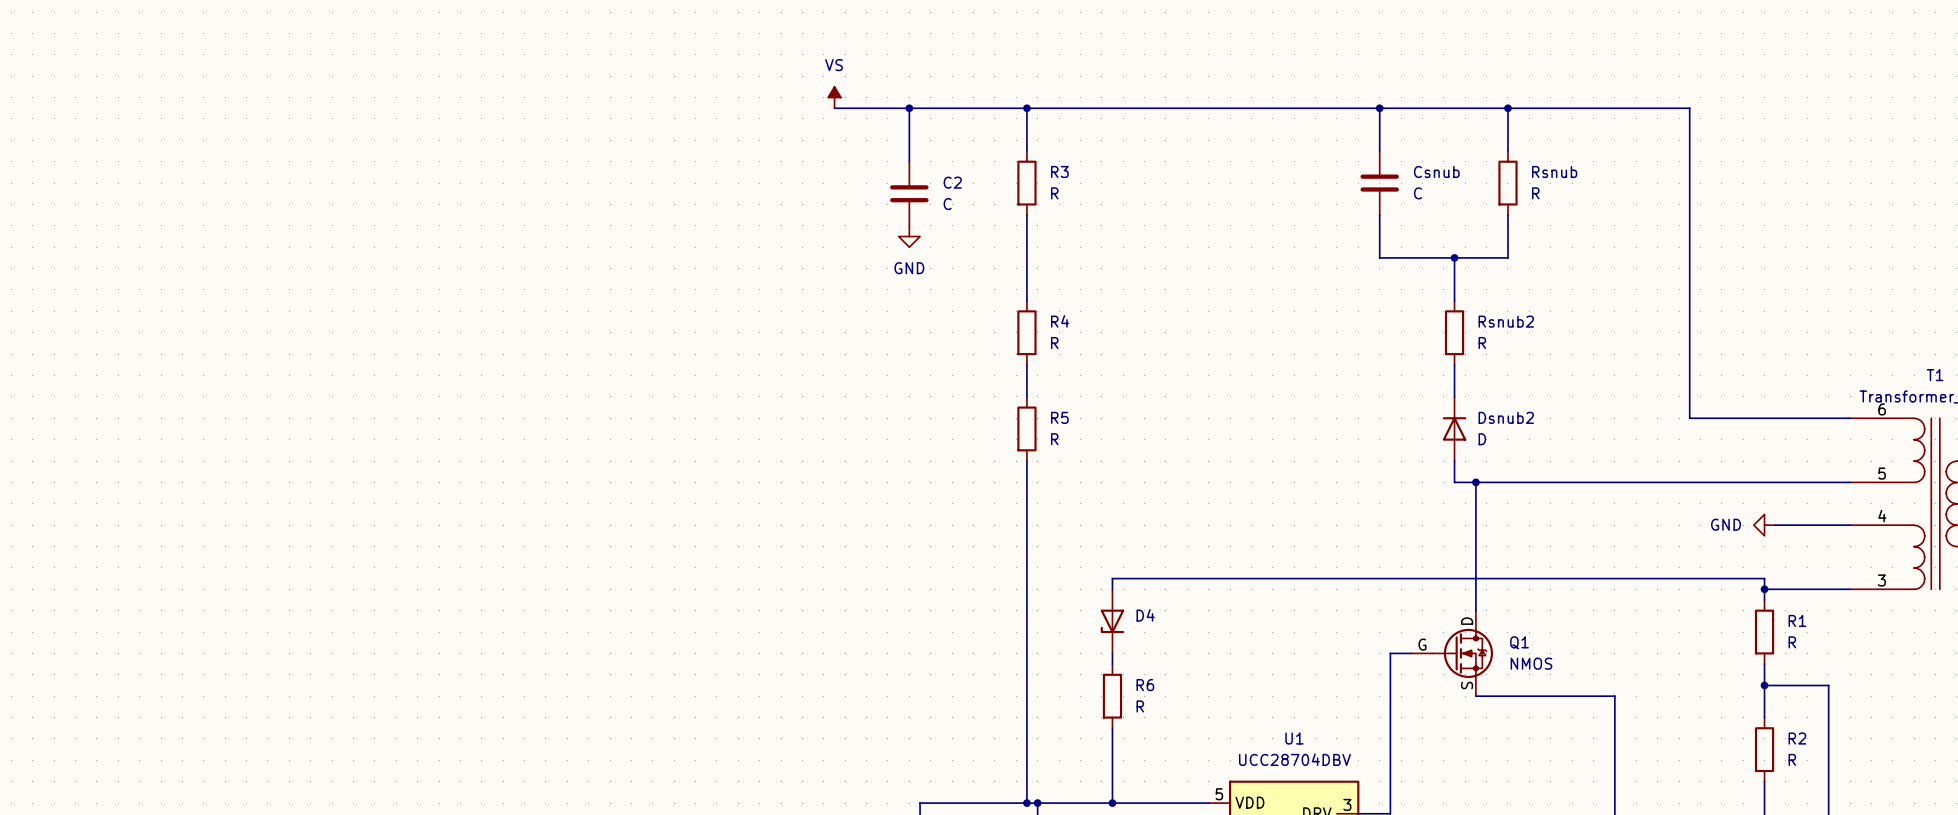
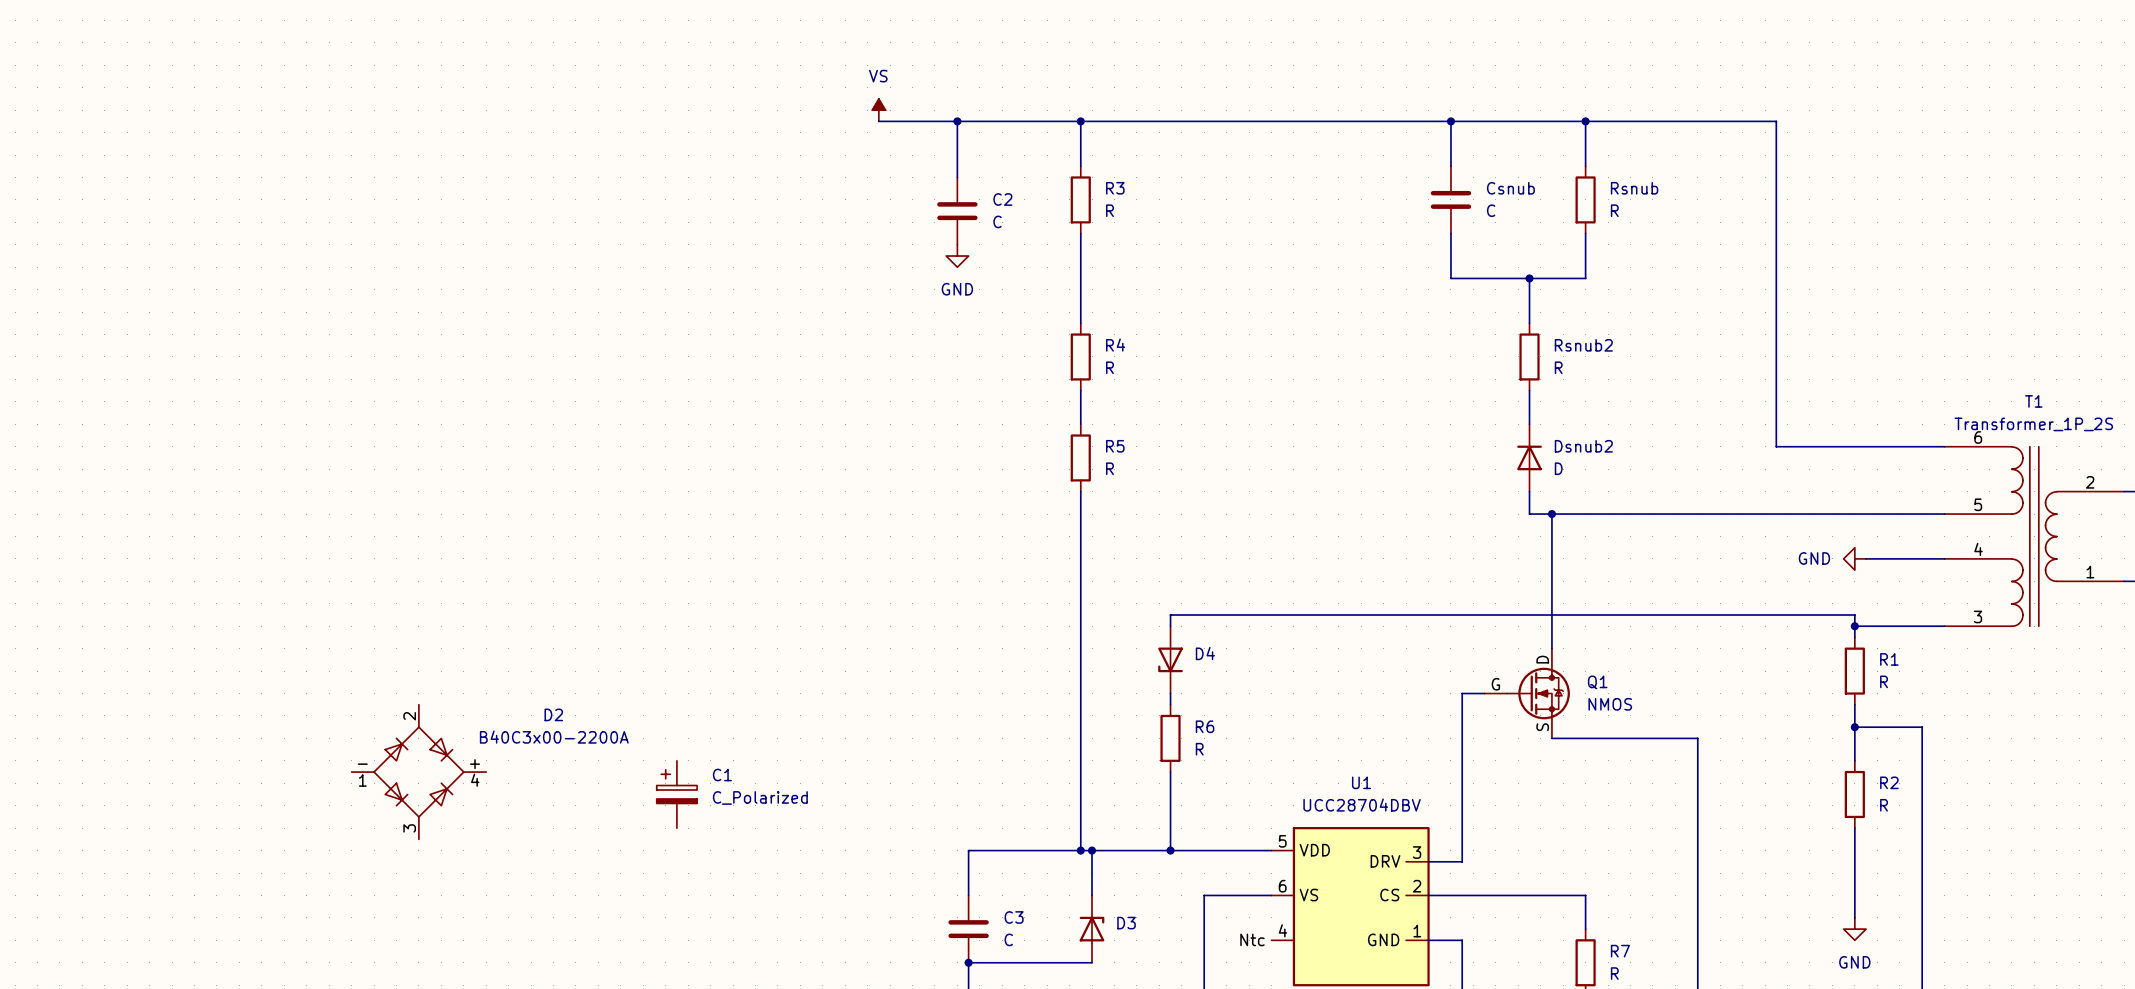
D2: none -> B40C3x00-2200A (418, 772)
C1: none -> C_Polarized (676, 794)

